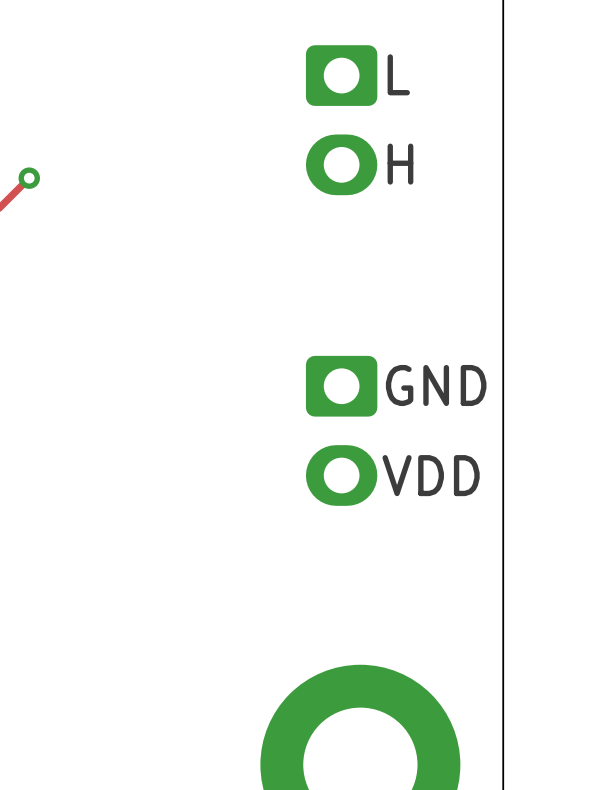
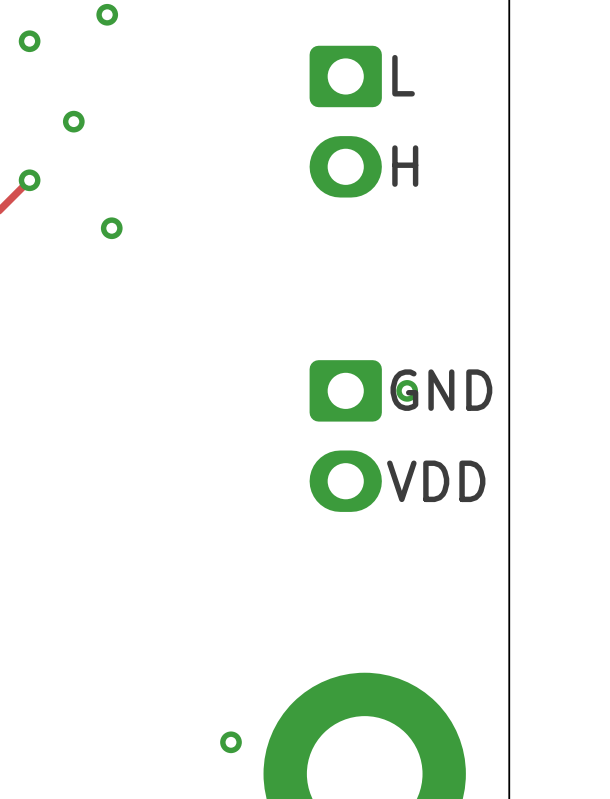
via: none -> (107, 14)
via: none -> (29, 41)
via: none -> (73, 121)
via: none -> (111, 228)
via: none -> (407, 390)
via: none -> (230, 742)

